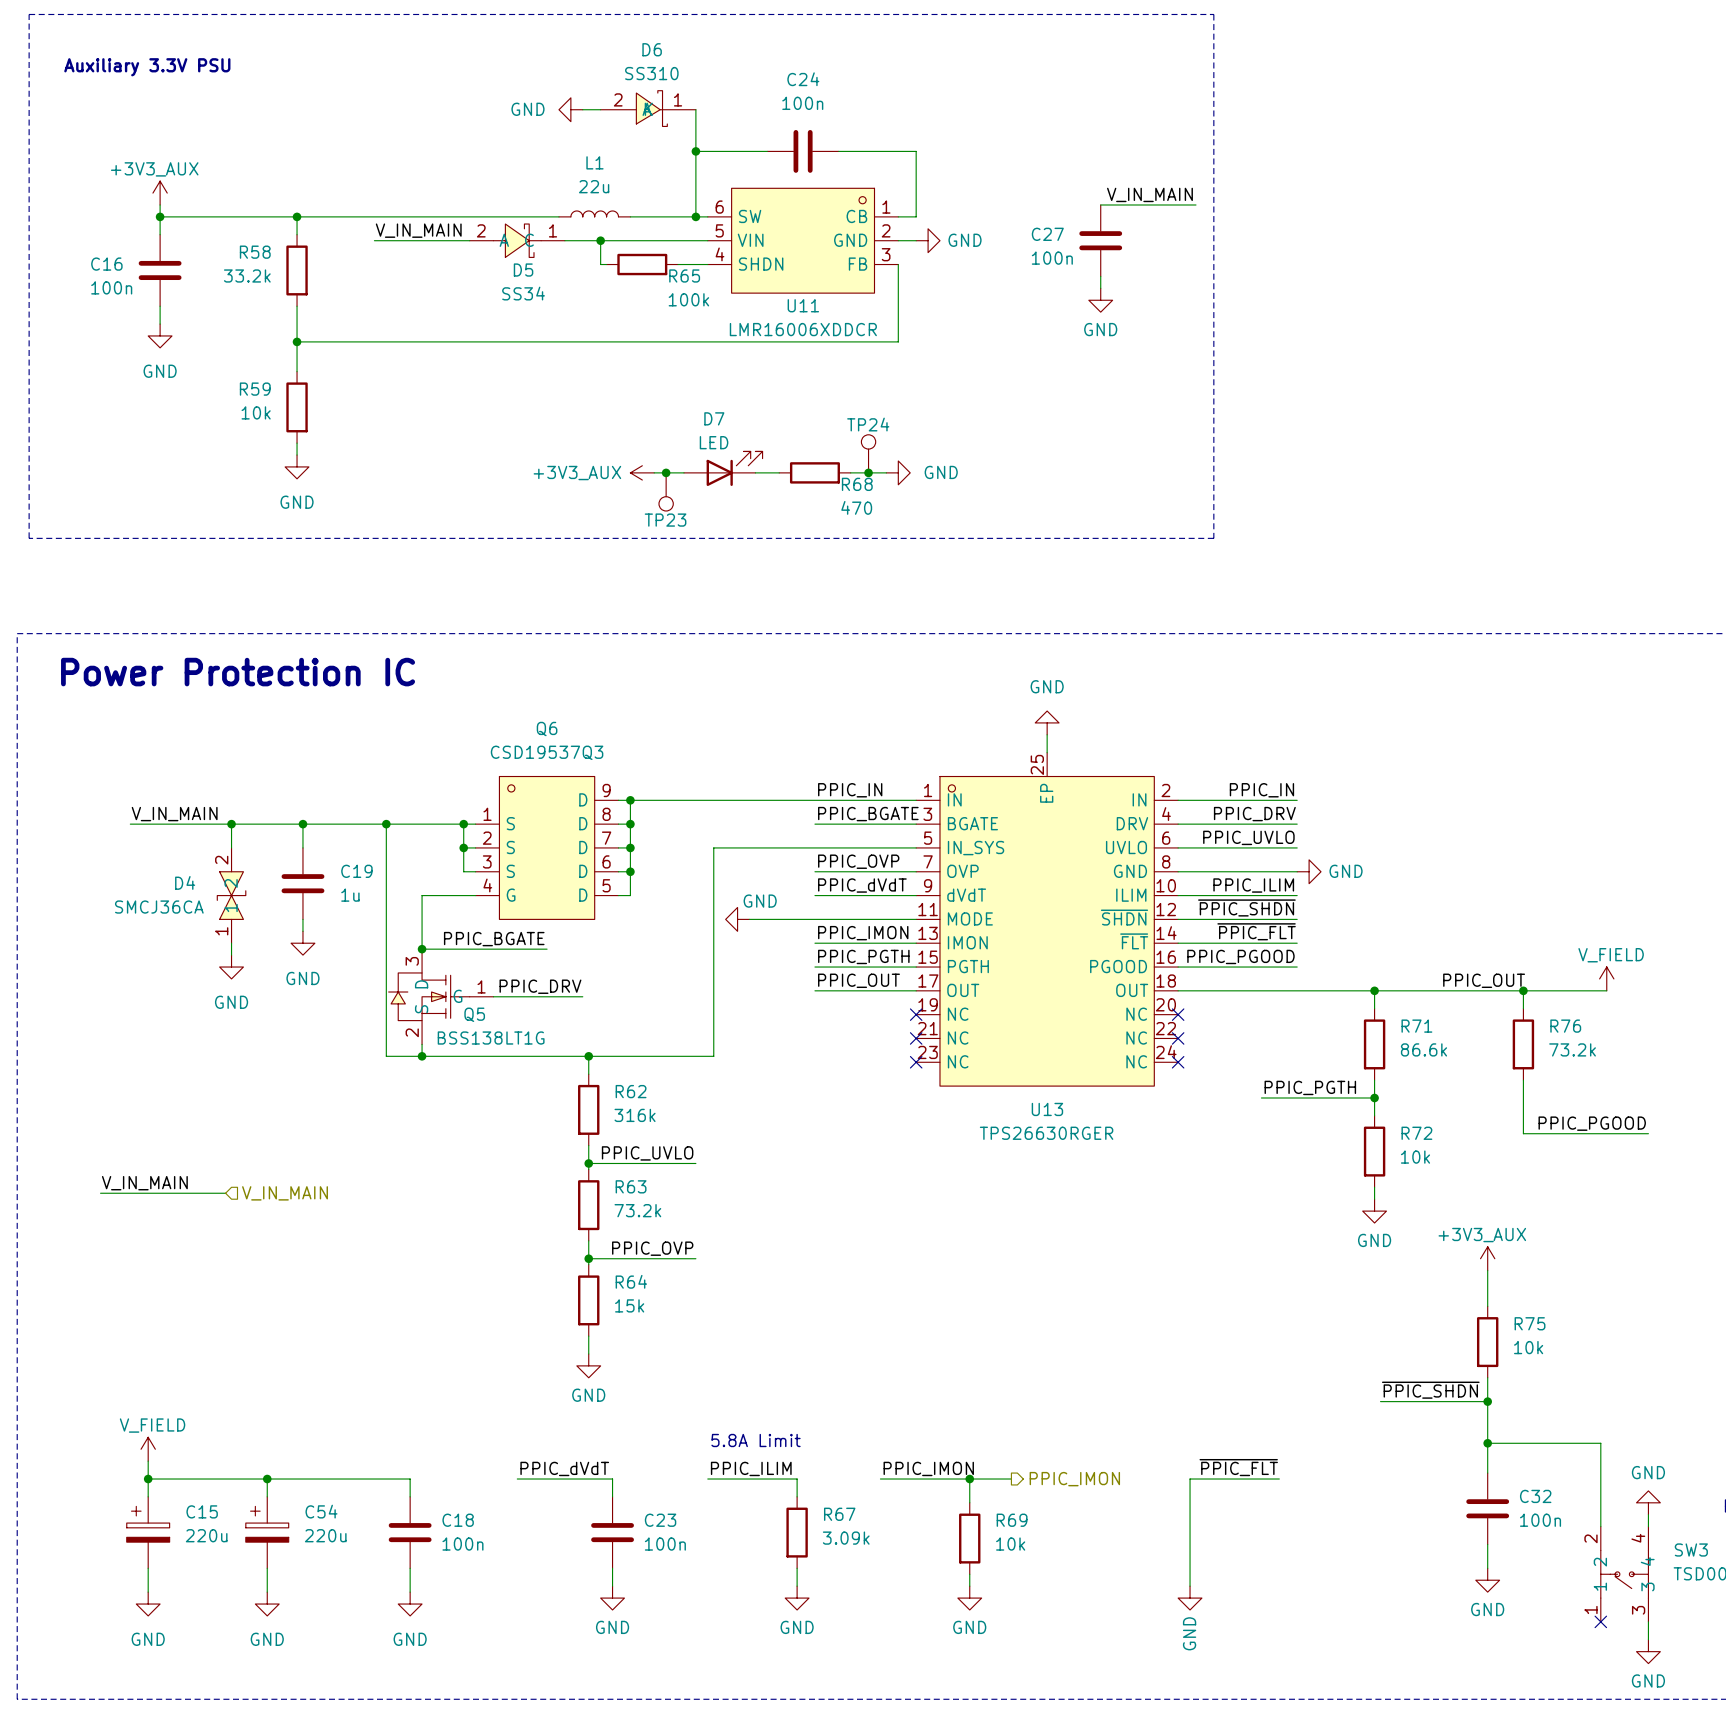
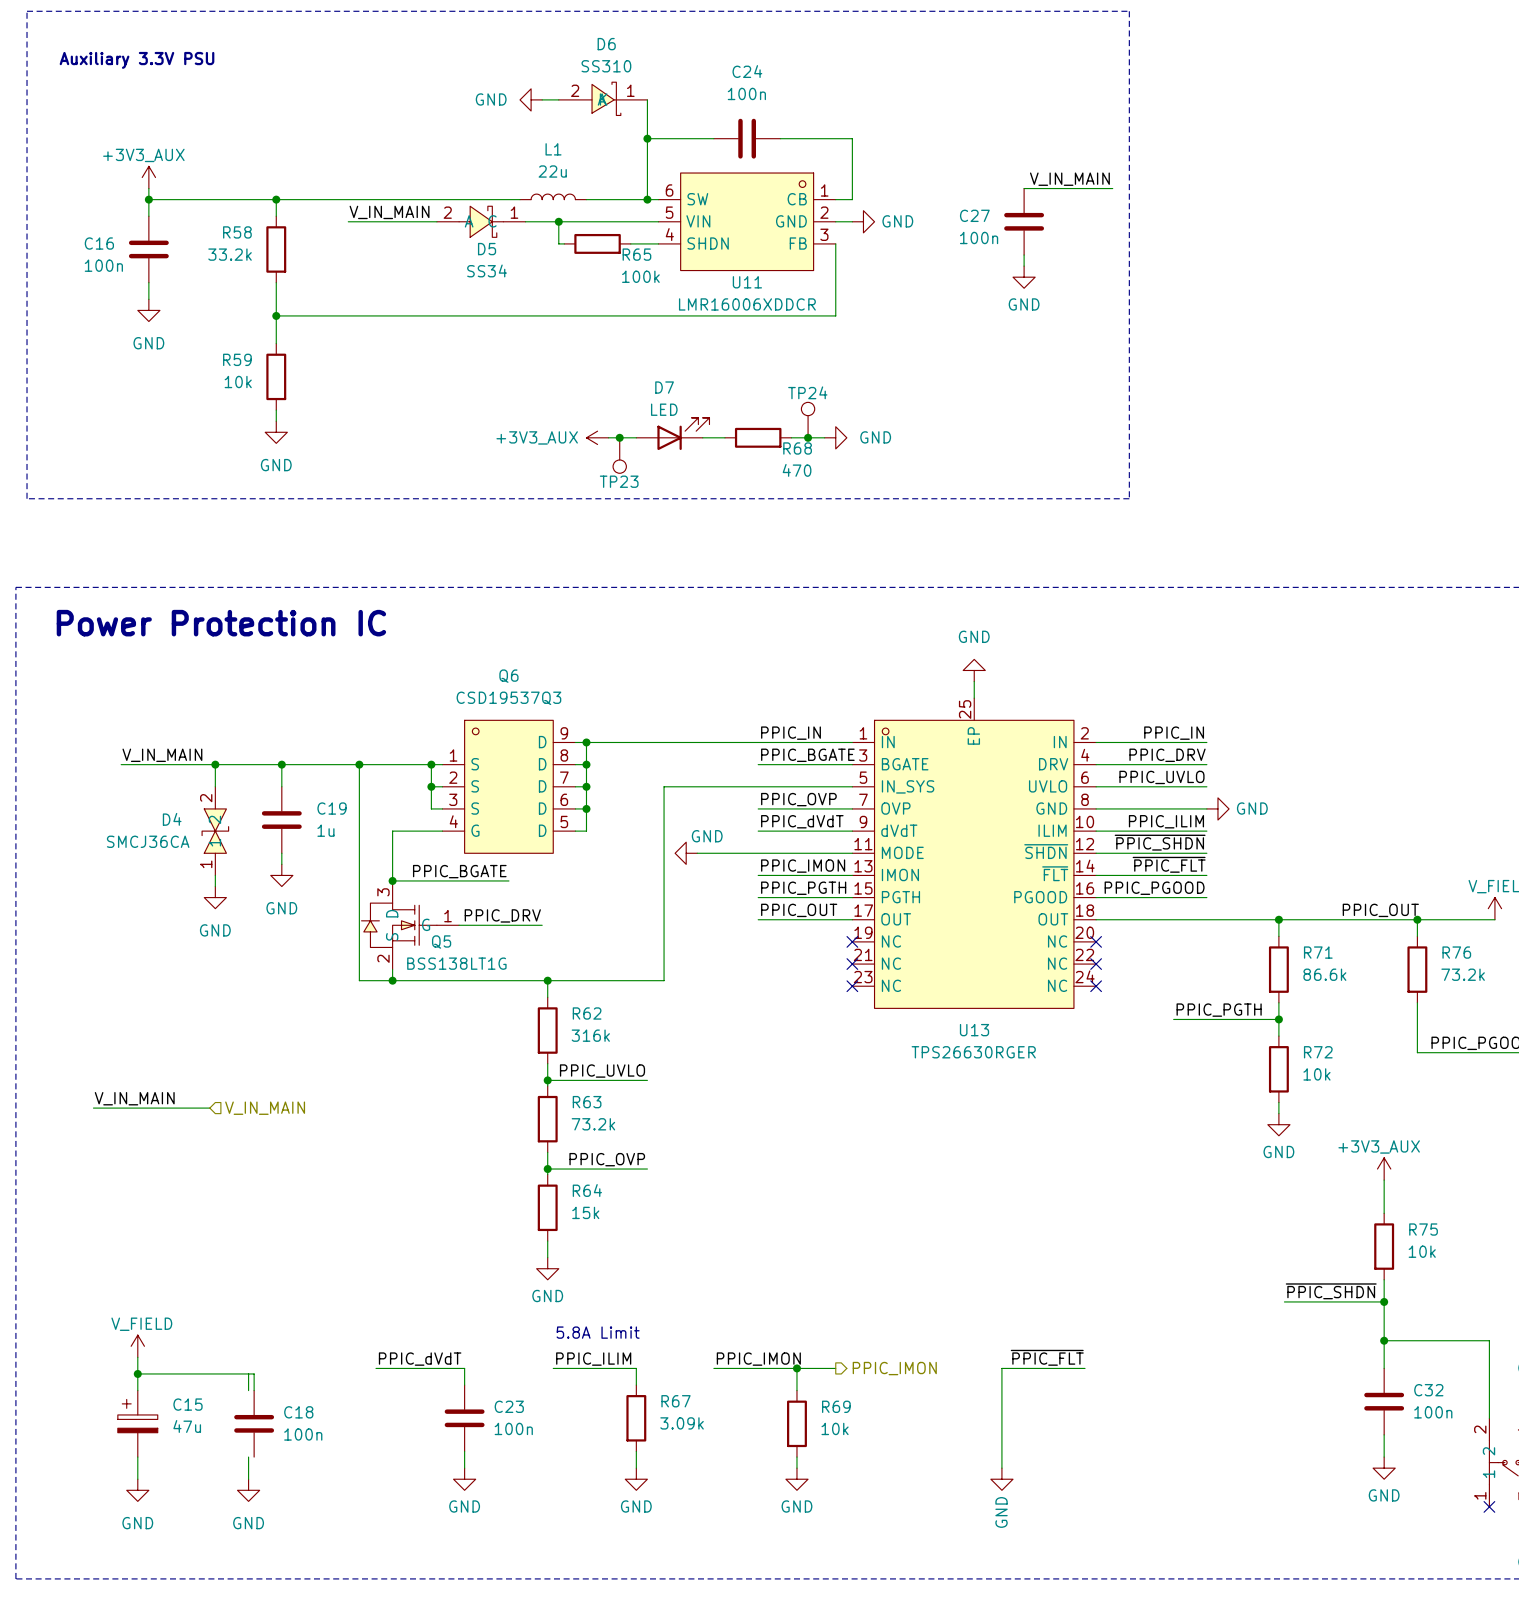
text position: 5.8A Limit (756, 1440) -> 5.8A Limit (598, 1332)
label position: ~{PPIC_FLT} (1238, 1467) -> ~{PPIC_FLT} (1047, 1357)
label position: PPIC_dVdT (564, 1468) -> PPIC_dVdT (420, 1359)
label position: PPIC_ILIM (751, 1468) -> PPIC_ILIM (593, 1359)
label position: PPIC_IMON (928, 1468) -> PPIC_IMON (758, 1359)
junction: none -> (796, 1368)
junction: (267, 1479) -> none
wire: (273, 1479) (410, 1479) (410, 1496) -> (254, 1373) (254, 1390)
wire: (517, 1479) (612, 1479) (612, 1496) -> (375, 1368) (464, 1368) (464, 1385)
wire: (707, 1479) (797, 1479) (797, 1496) -> (553, 1368) (636, 1368) (636, 1385)
wire: (880, 1479) (1011, 1479) -> (713, 1368) (835, 1368)
wire: (969, 1479) (969, 1502) -> (796, 1368) (796, 1390)
junction: (969, 1479) -> none
hierarchical label position: PPIC_IMON (1074, 1479) -> PPIC_IMON (894, 1368)
wire: (1279, 1479) (1190, 1479) (1190, 1586) -> (1085, 1368) (1001, 1368) (1001, 1468)
C54: 220u (267, 1532) -> none
C18 position: (410, 1532) -> (254, 1423)
C23 position: (612, 1532) -> (464, 1418)
R67 position: (797, 1532) -> (636, 1418)
C15 value: 220u (206, 1535) -> 47u (187, 1426)
R69 position: (969, 1538) -> (796, 1423)
wire: (410, 1568) (410, 1592) -> none
wire: (612, 1568) (612, 1586) -> (464, 1451) (464, 1468)
wire: (797, 1568) (797, 1586) -> (636, 1451) (636, 1468)
wire: (969, 1574) (969, 1586) -> (796, 1457) (796, 1468)
power symbol: none -> GND (464, 1479)
power symbol: none -> GND (636, 1479)
power symbol: none -> GND (796, 1479)
power symbol: none -> GND (1001, 1479)
power symbol: GND (612, 1598) -> none
power symbol: GND (797, 1598) -> none
power symbol: GND (969, 1598) -> none
power symbol: GND (1190, 1598) -> none
power symbol: GND (410, 1604) -> none

